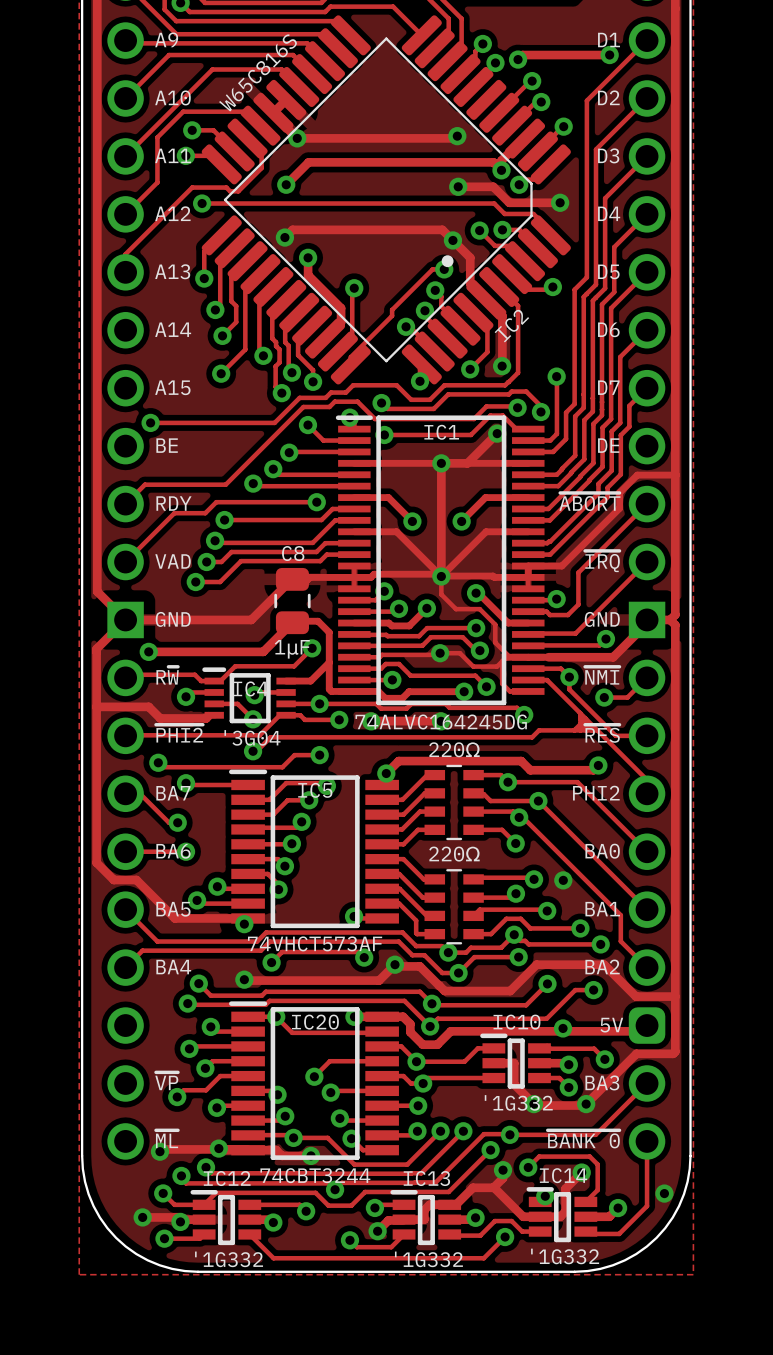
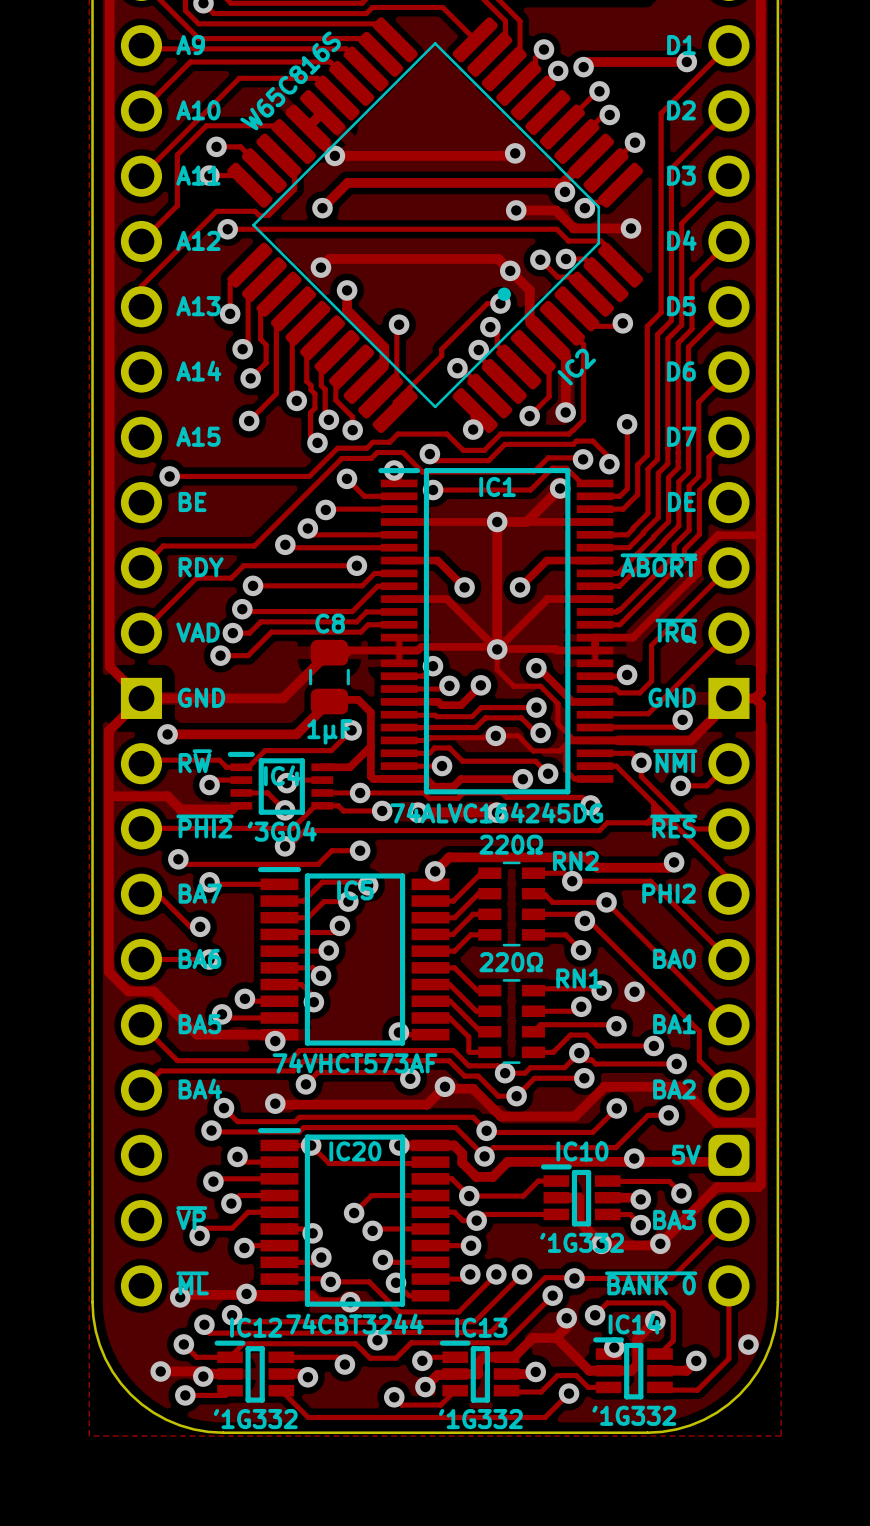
RN2 name: none -> RN2 (575, 860)
RN1 name: none -> RN1 (579, 978)

